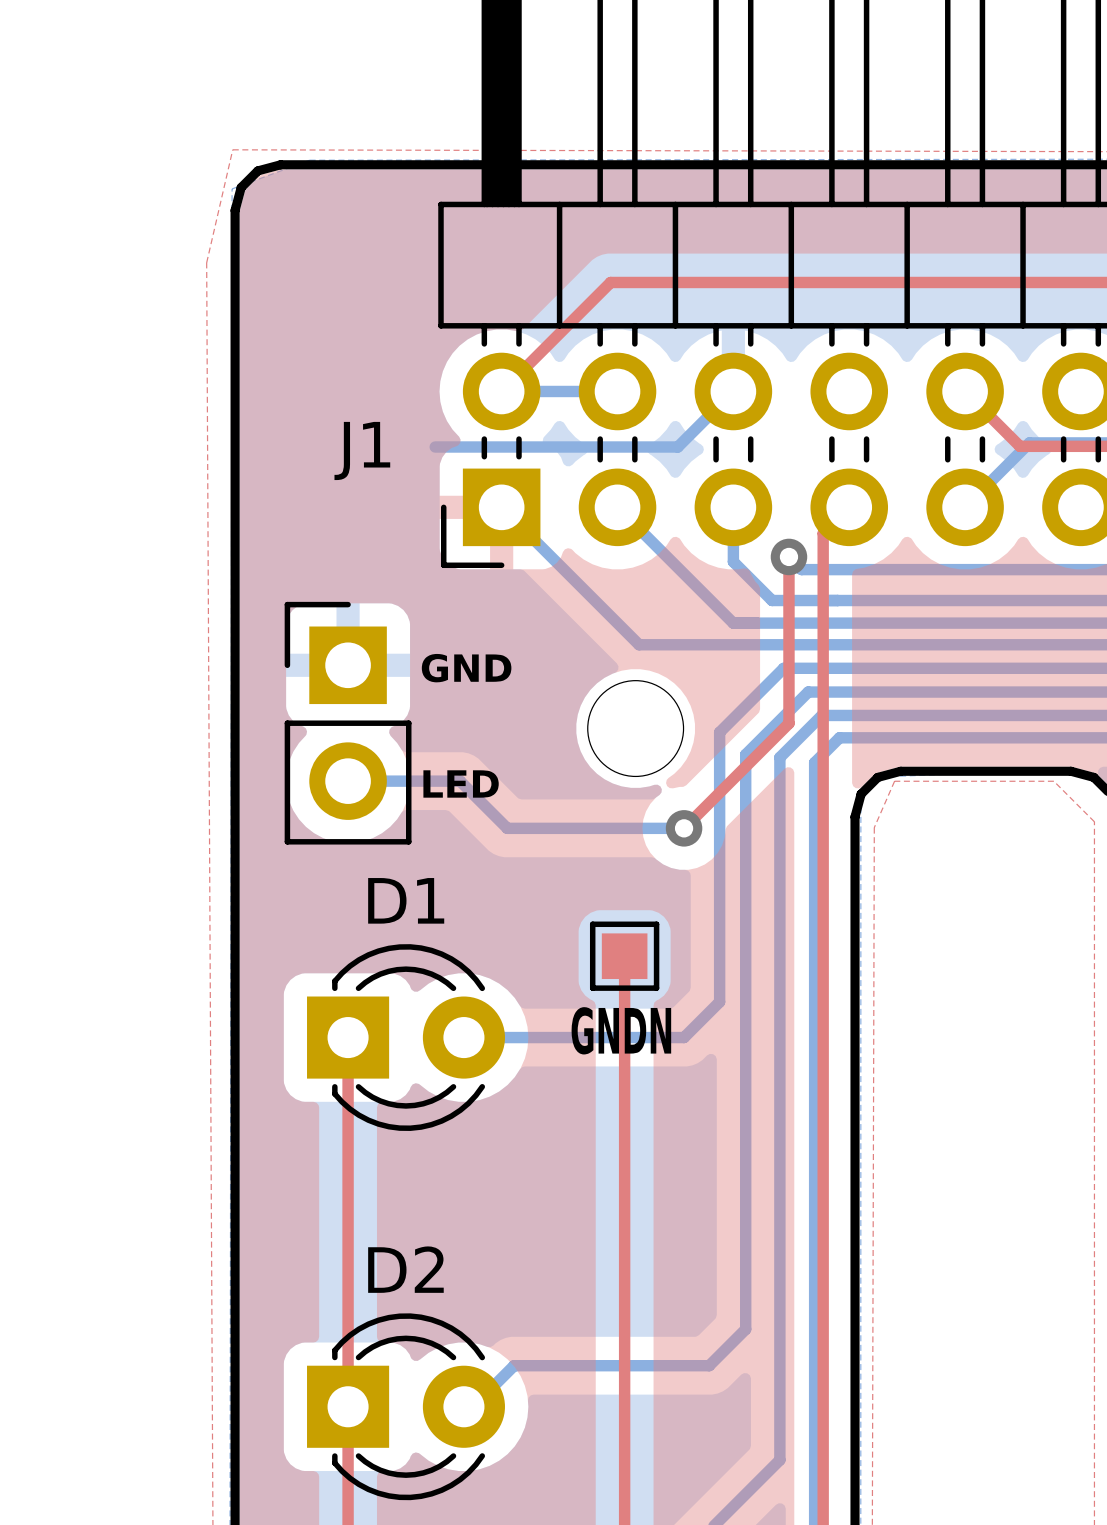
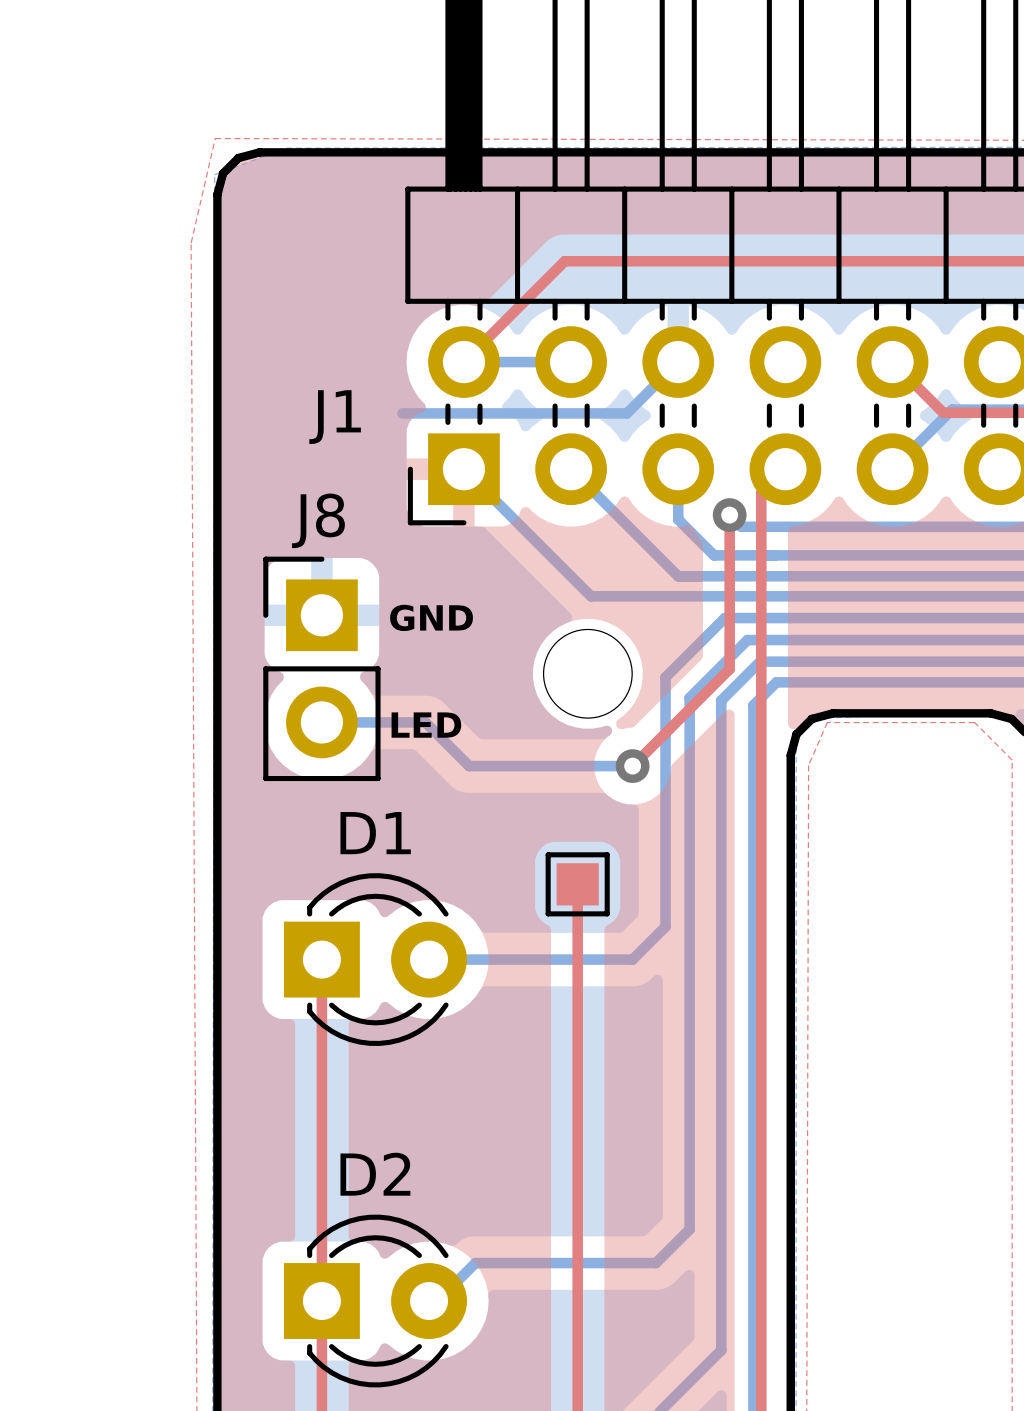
J8 name: none -> J8 (318, 520)
text: GNDN (621, 1030) -> none

